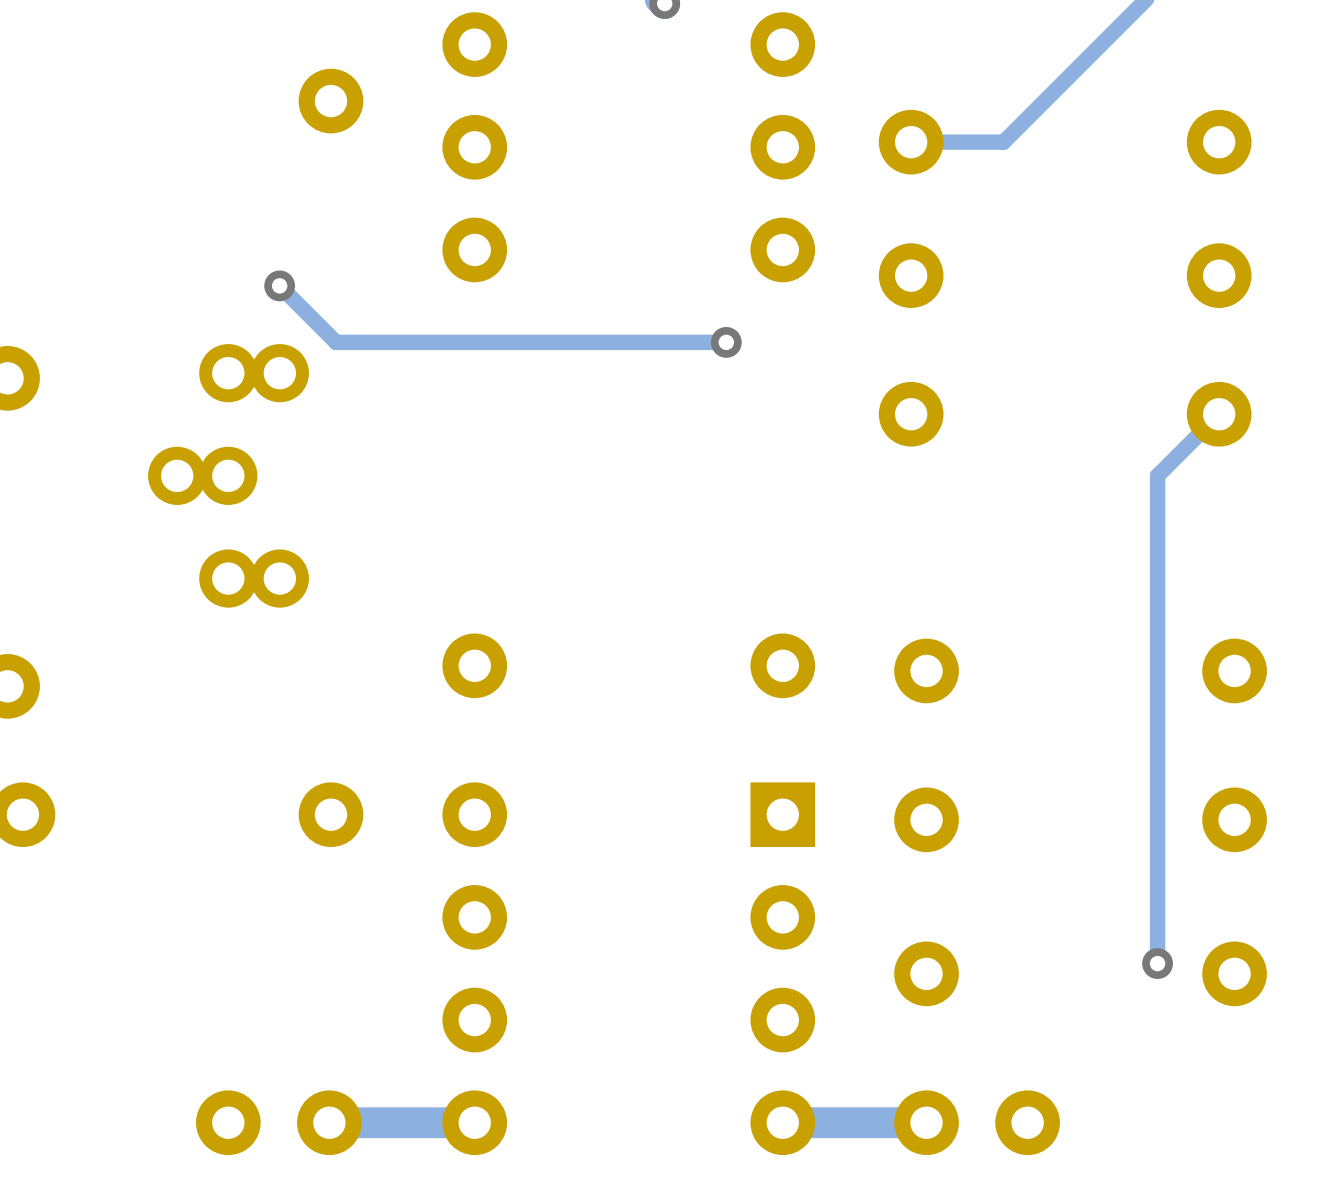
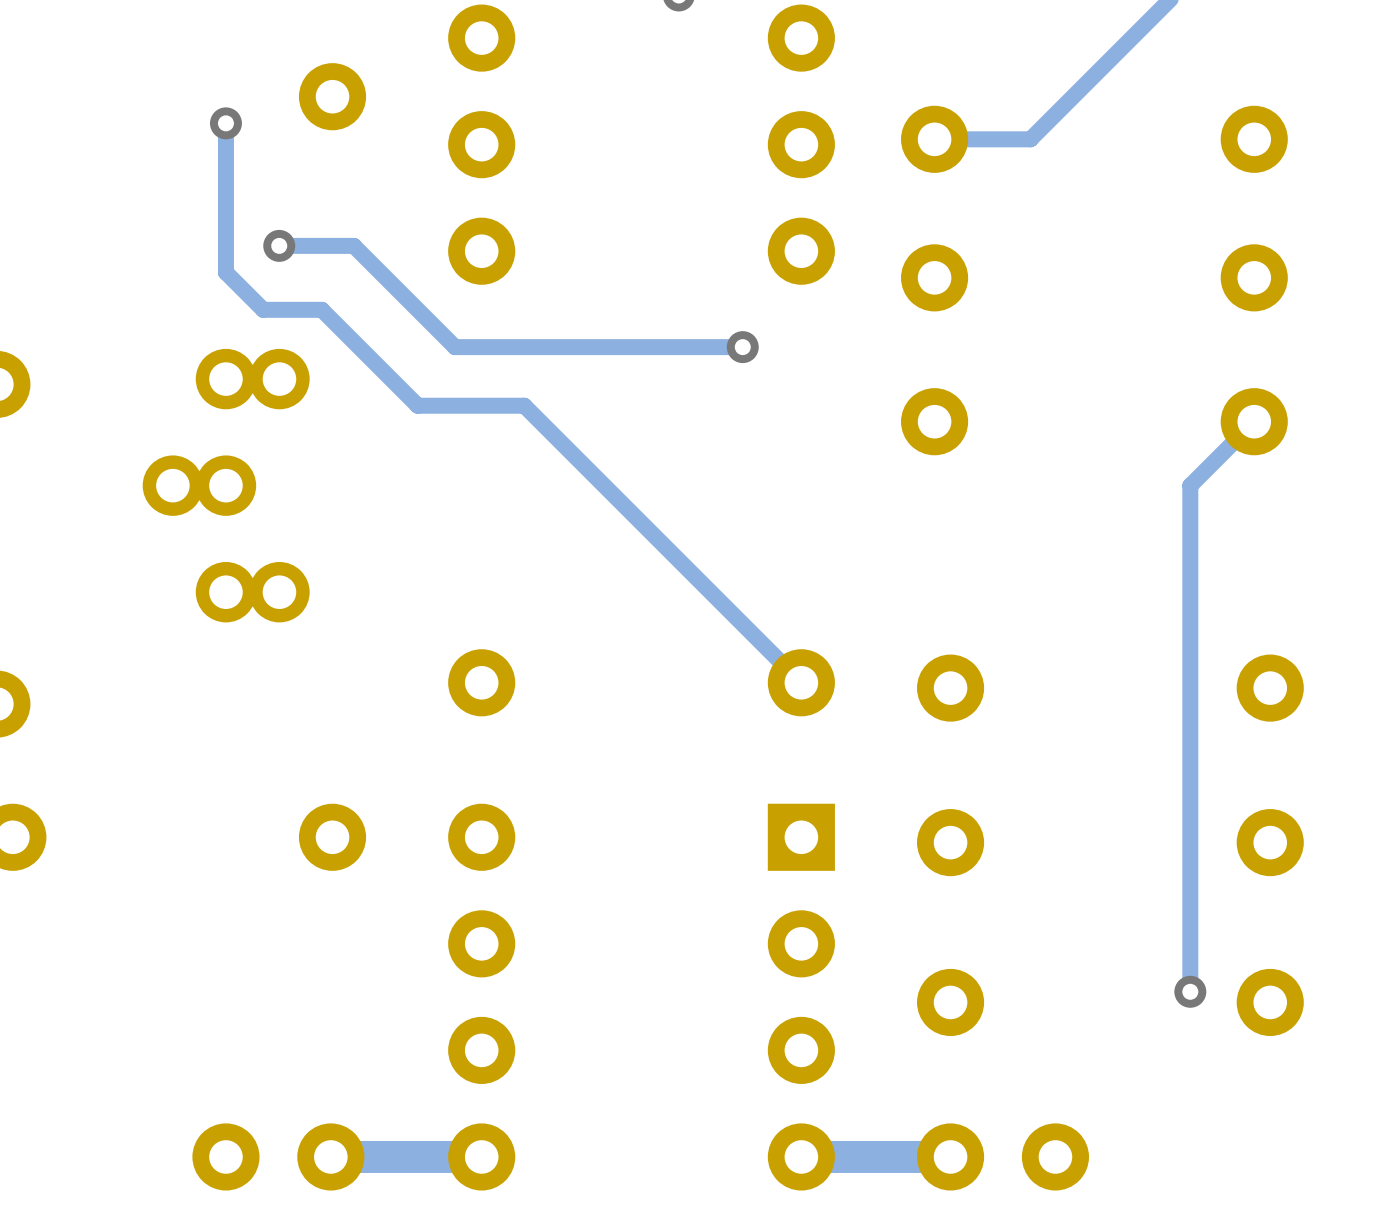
track: none -> (225, 123) (225, 272) (263, 309) (321, 309) (417, 405) (524, 405) (801, 682)
via: none -> (225, 123)
track: (279, 285) (336, 342) (449, 342) -> (279, 245) (353, 245) (455, 347)
via position: (279, 285) -> (279, 245)

